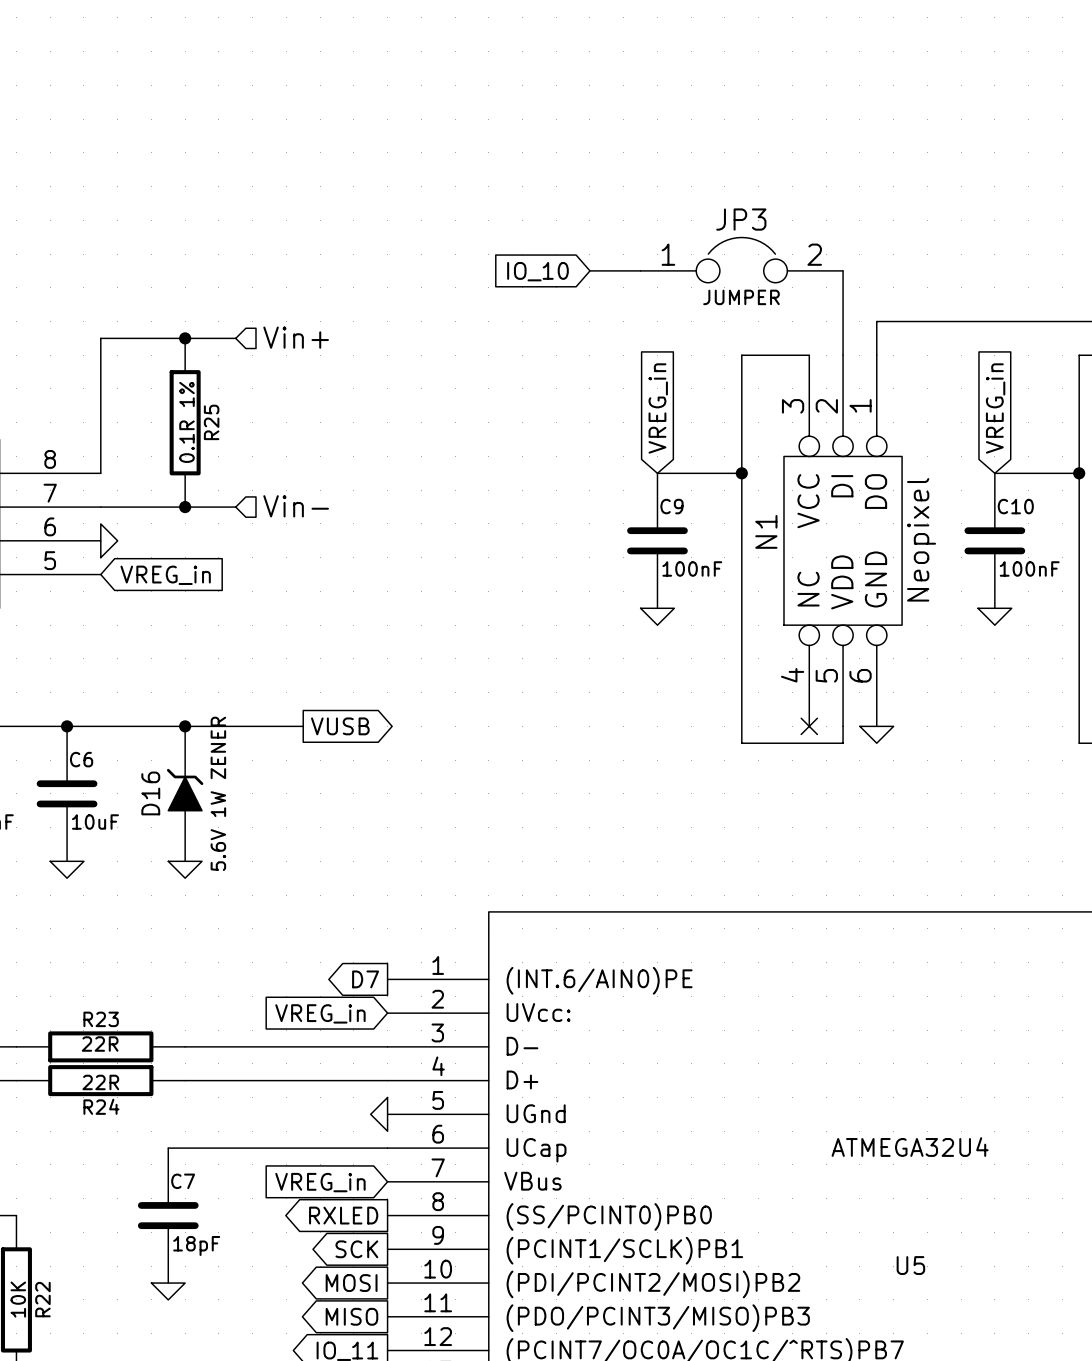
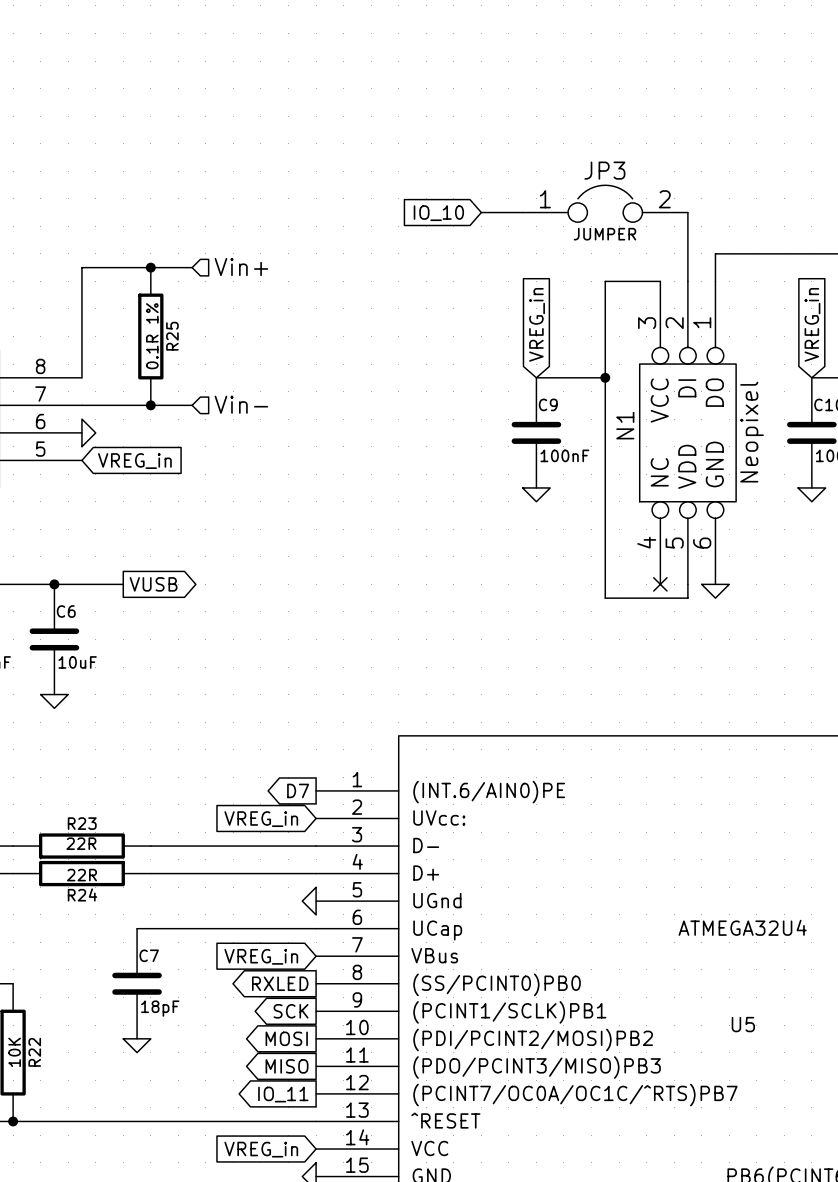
wire: (151, 726) (303, 726) -> none
junction: (185, 726) -> none
global label position: VUSB (340, 726) -> VUSB (153, 584)
D16: 5.6V 1W ZENER (185, 793) -> none
power symbol: (185, 869) -> none

